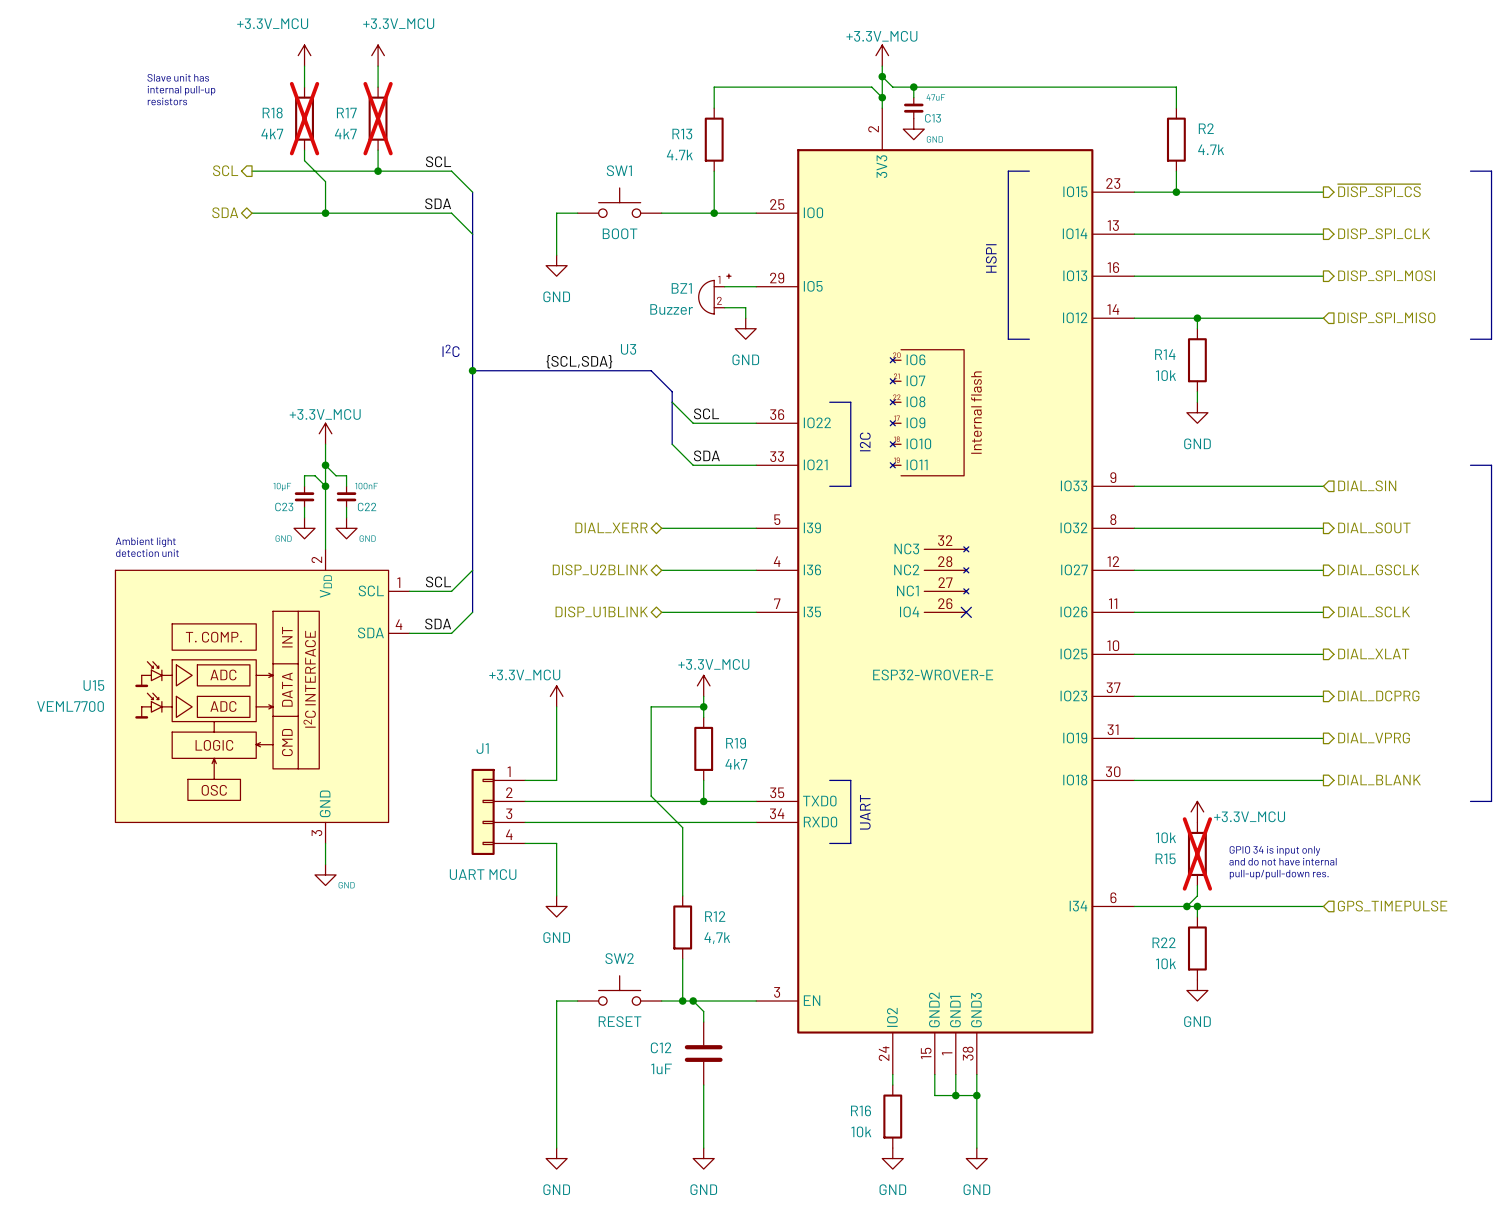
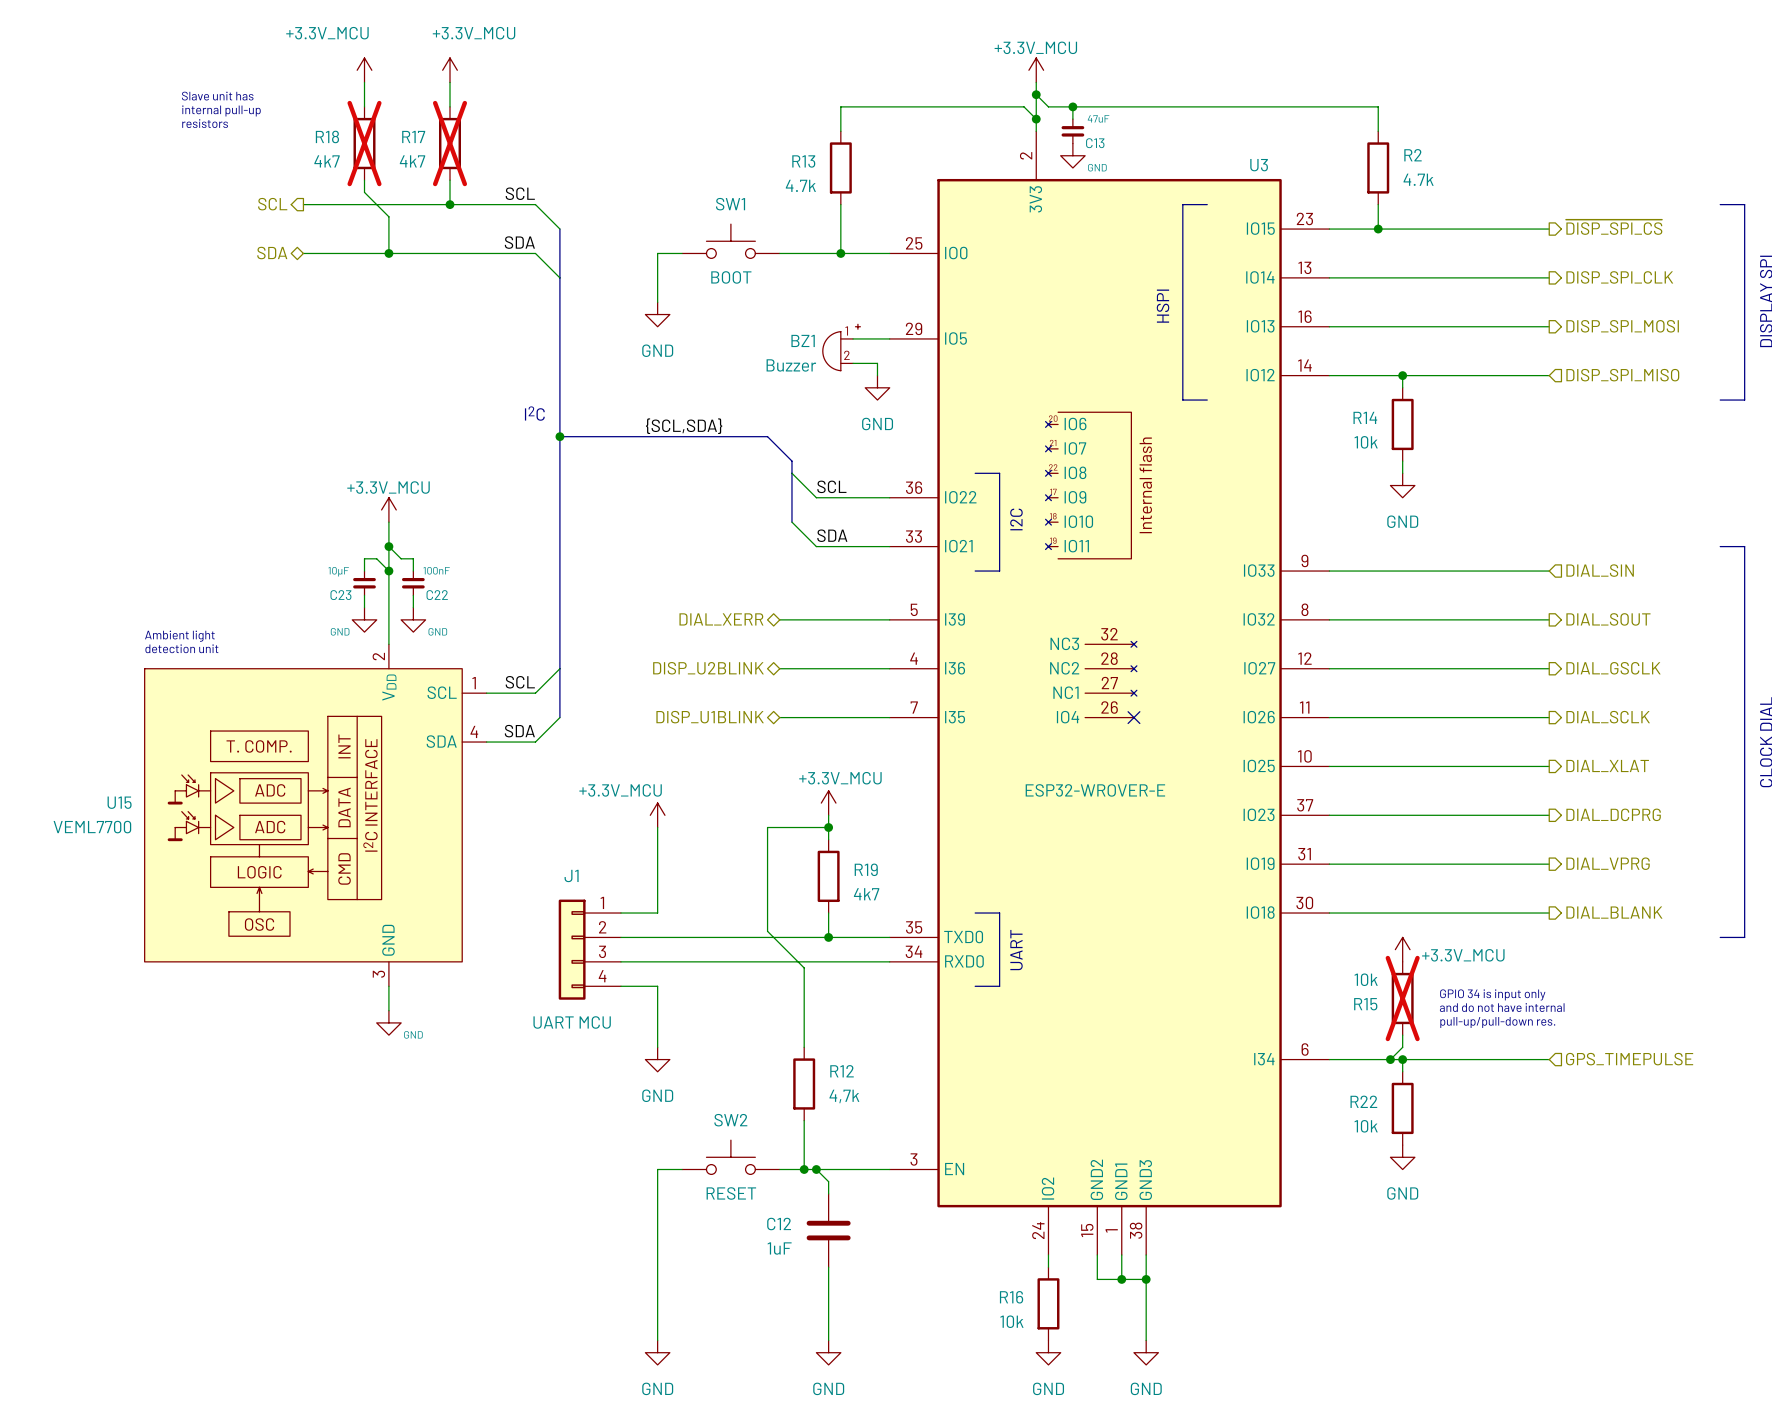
U3 name position: U3 (628, 349) -> U3 (1259, 165)

